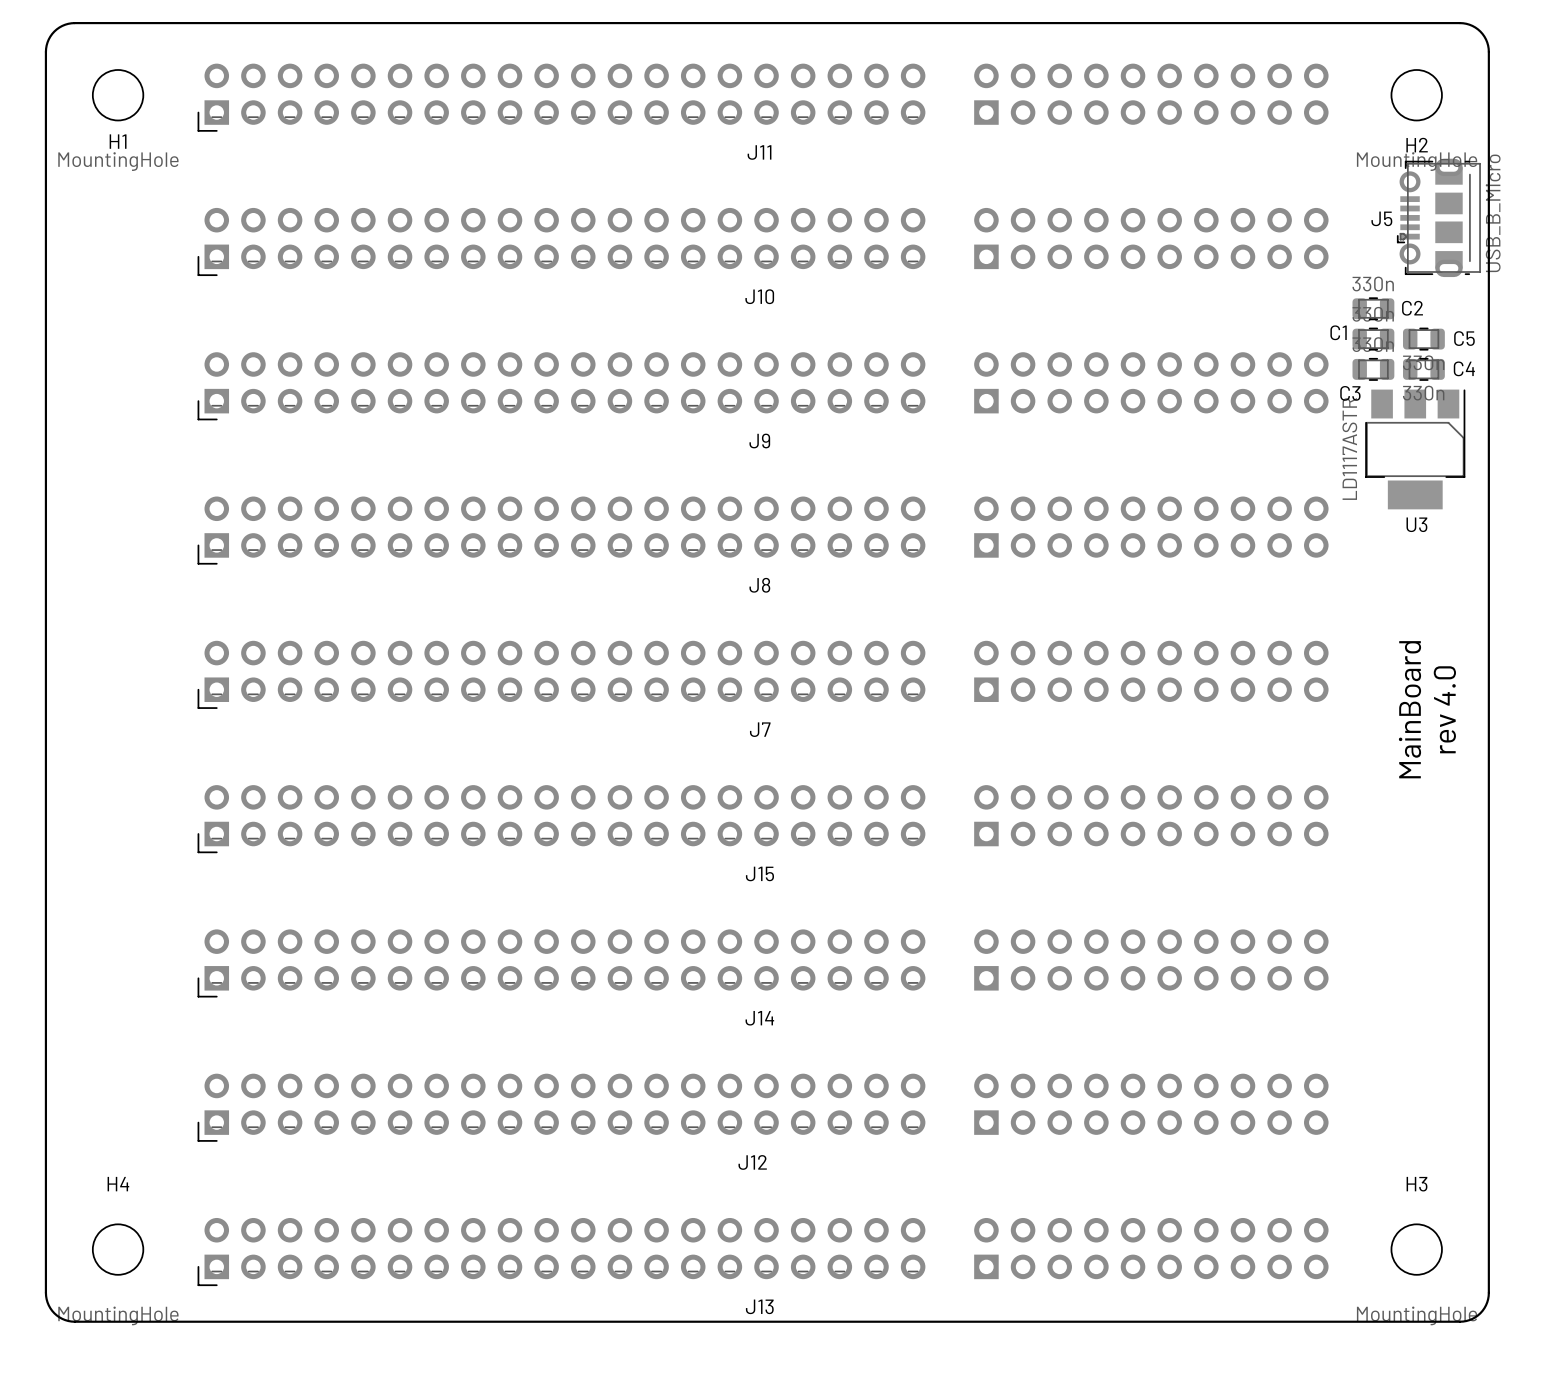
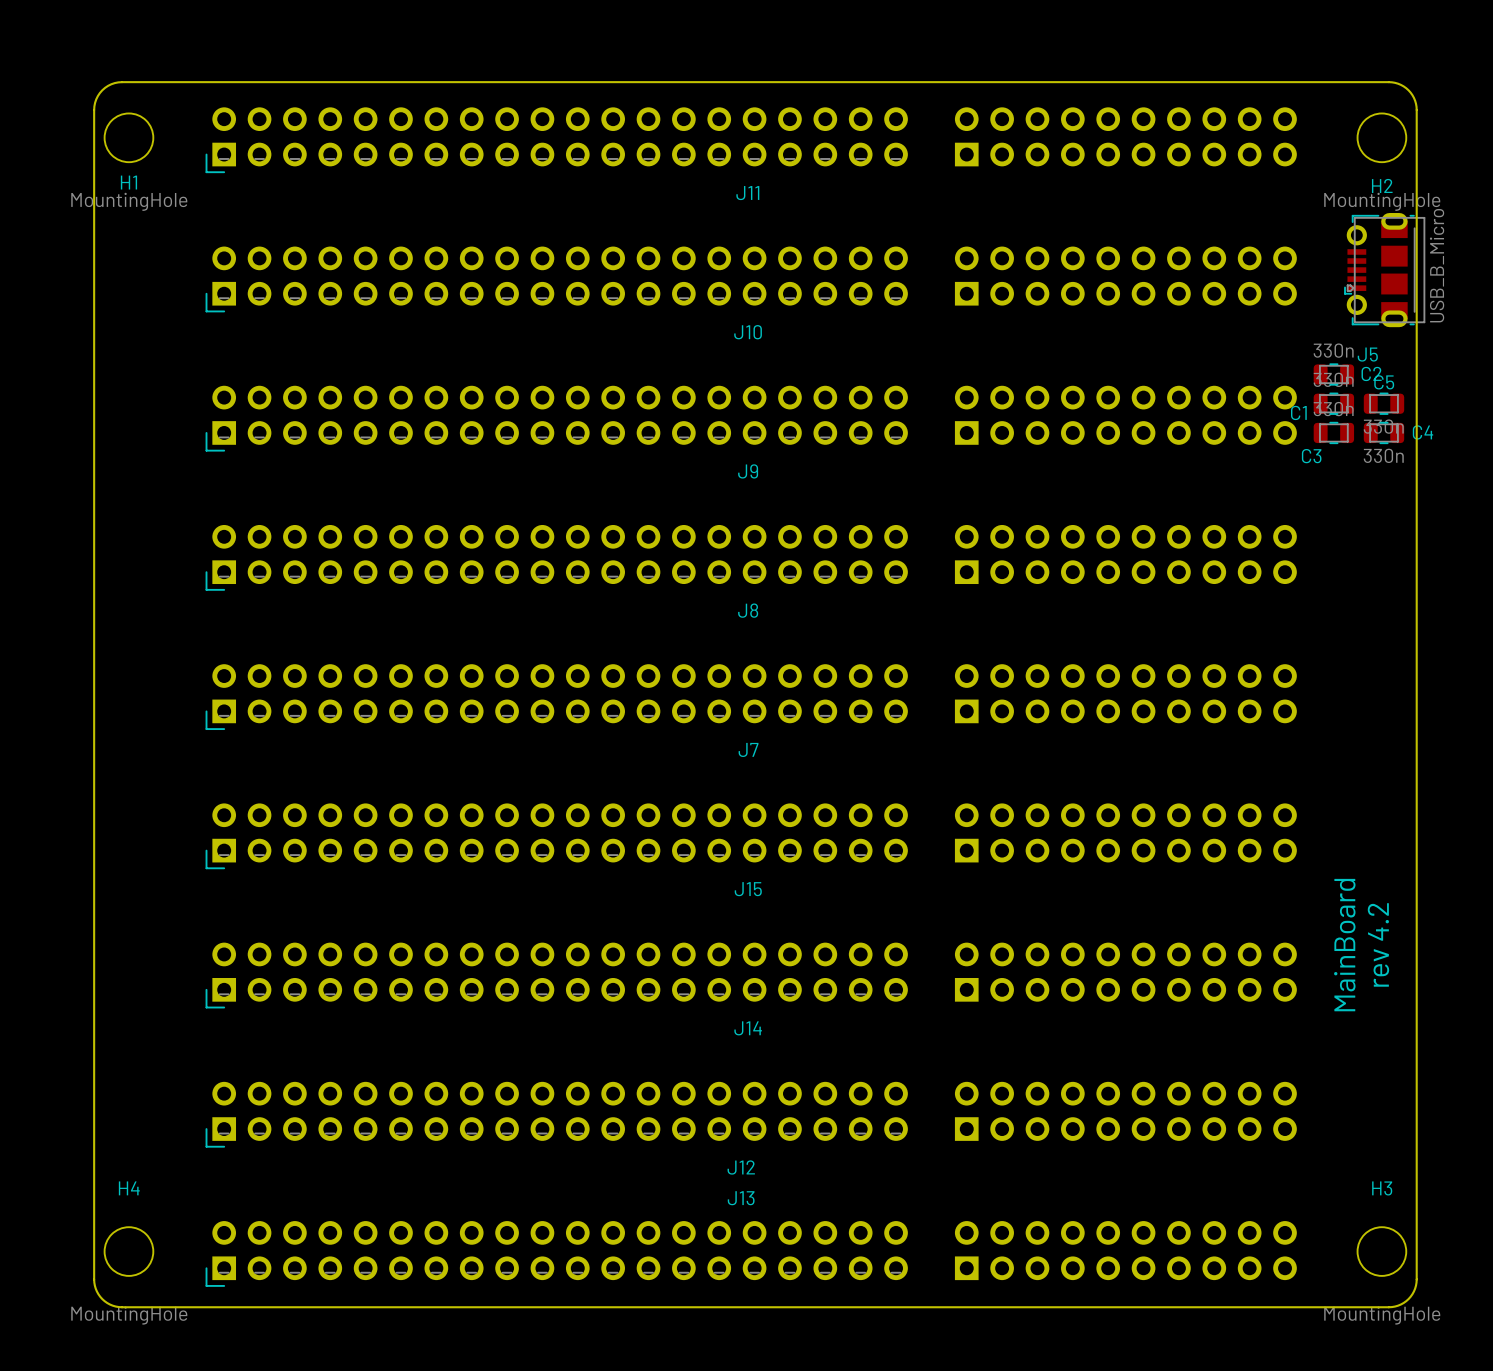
board edge: (74, 23) (1459, 23) (1469, 24) (1480, 31) (1486, 39) (1488, 51) (1488, 1292) (1486, 1305) (1480, 1313) (1472, 1318) (1459, 1321) (74, 1321) (65, 1320) (54, 1313) (47, 1302) (45, 1292) (45, 51) (48, 39) (54, 31) (62, 25) (74, 23) -> (121, 82) (1388, 82) (1400, 84) (1408, 90) (1415, 100) (1416, 109) (1416, 1279) (1413, 1291) (1408, 1299) (1400, 1304) (1388, 1307) (121, 1307) (109, 1304) (102, 1299) (96, 1291) (94, 1279) (94, 109) (96, 99) (102, 90) (111, 84) (121, 82)
J5 position: (1438, 217) -> (1384, 270)
J5 name position: J5 (1381, 218) -> J5 (1367, 354)
C2 position: (1373, 308) -> (1333, 374)
C1 name position: C1 (1338, 332) -> C1 (1298, 412)
C5 name position: C5 (1464, 338) -> C5 (1384, 382)
C1 position: (1373, 339) -> (1333, 403)
C5 position: (1423, 339) -> (1383, 403)
C3 position: (1373, 369) -> (1333, 432)
C4 position: (1423, 369) -> (1383, 432)
U3: LD1117ASTR (1415, 449) -> none
text position: MainBoard (1409, 709) -> MainBoard (1344, 945)
text: rev 4.0 (1444, 709) -> none
text: none -> rev 4.2 (1378, 944)
J13 name position: J13 (759, 1306) -> J13 (741, 1198)

